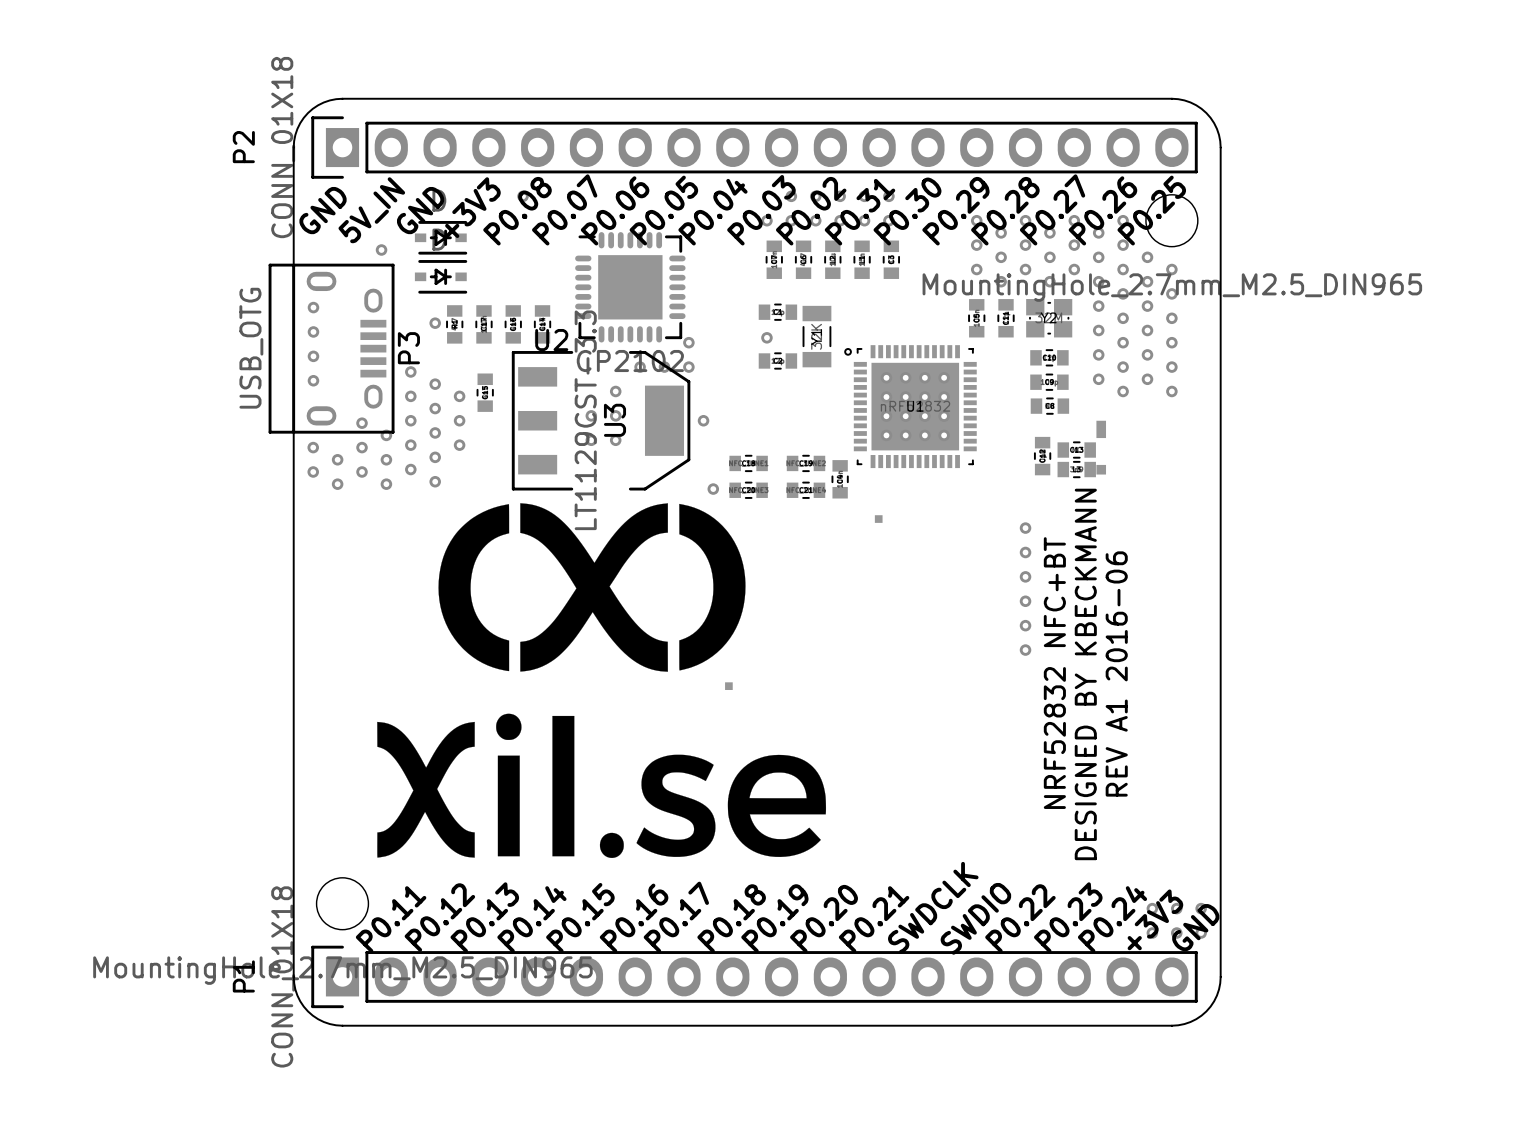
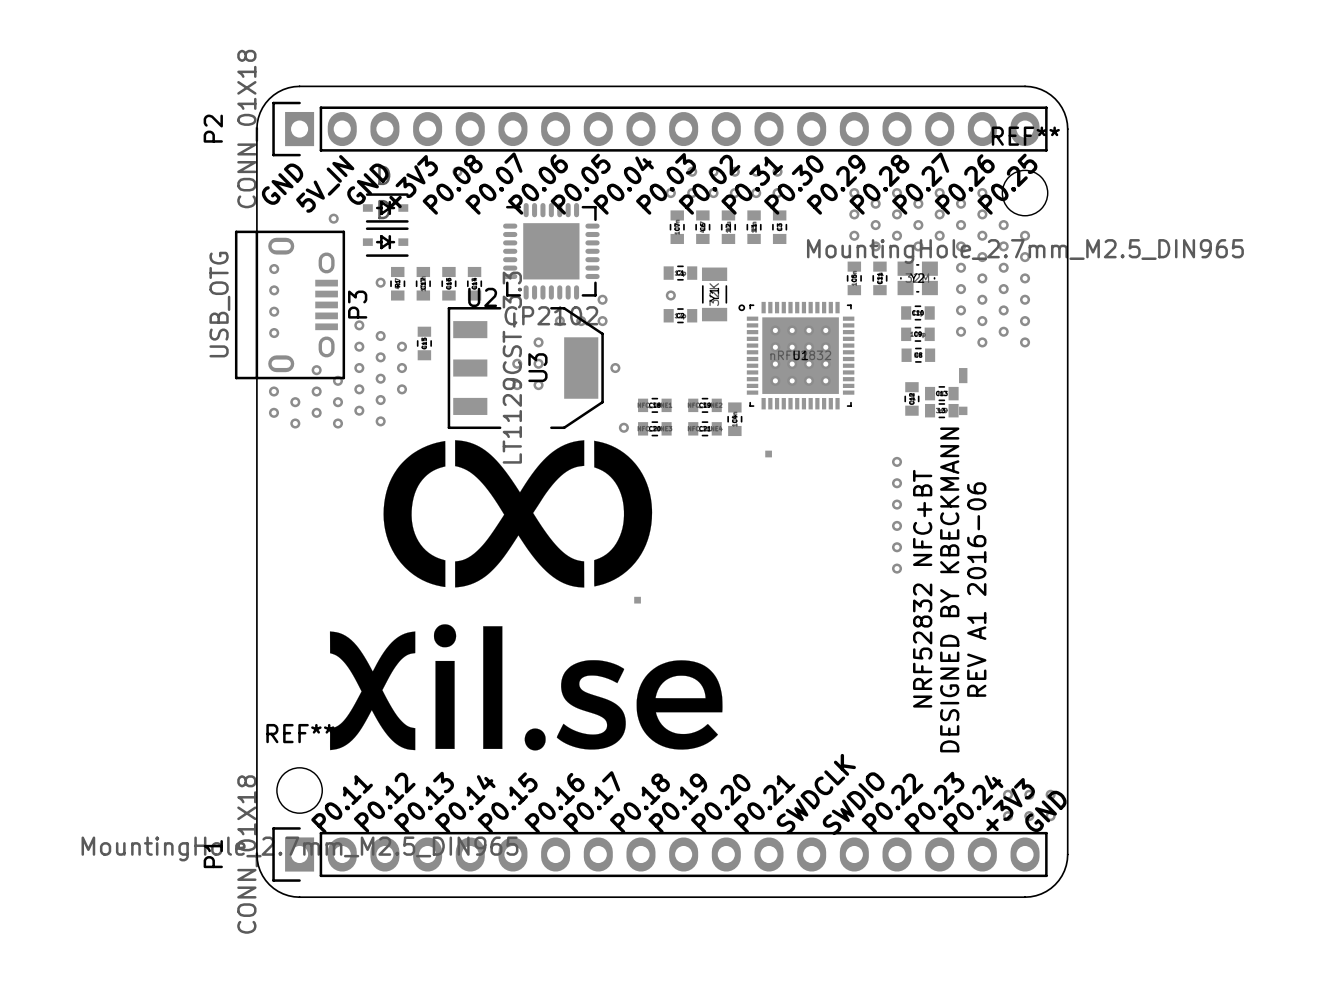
REF** name: none -> REF** (1025, 136)
REF** name: none -> REF** (300, 733)

